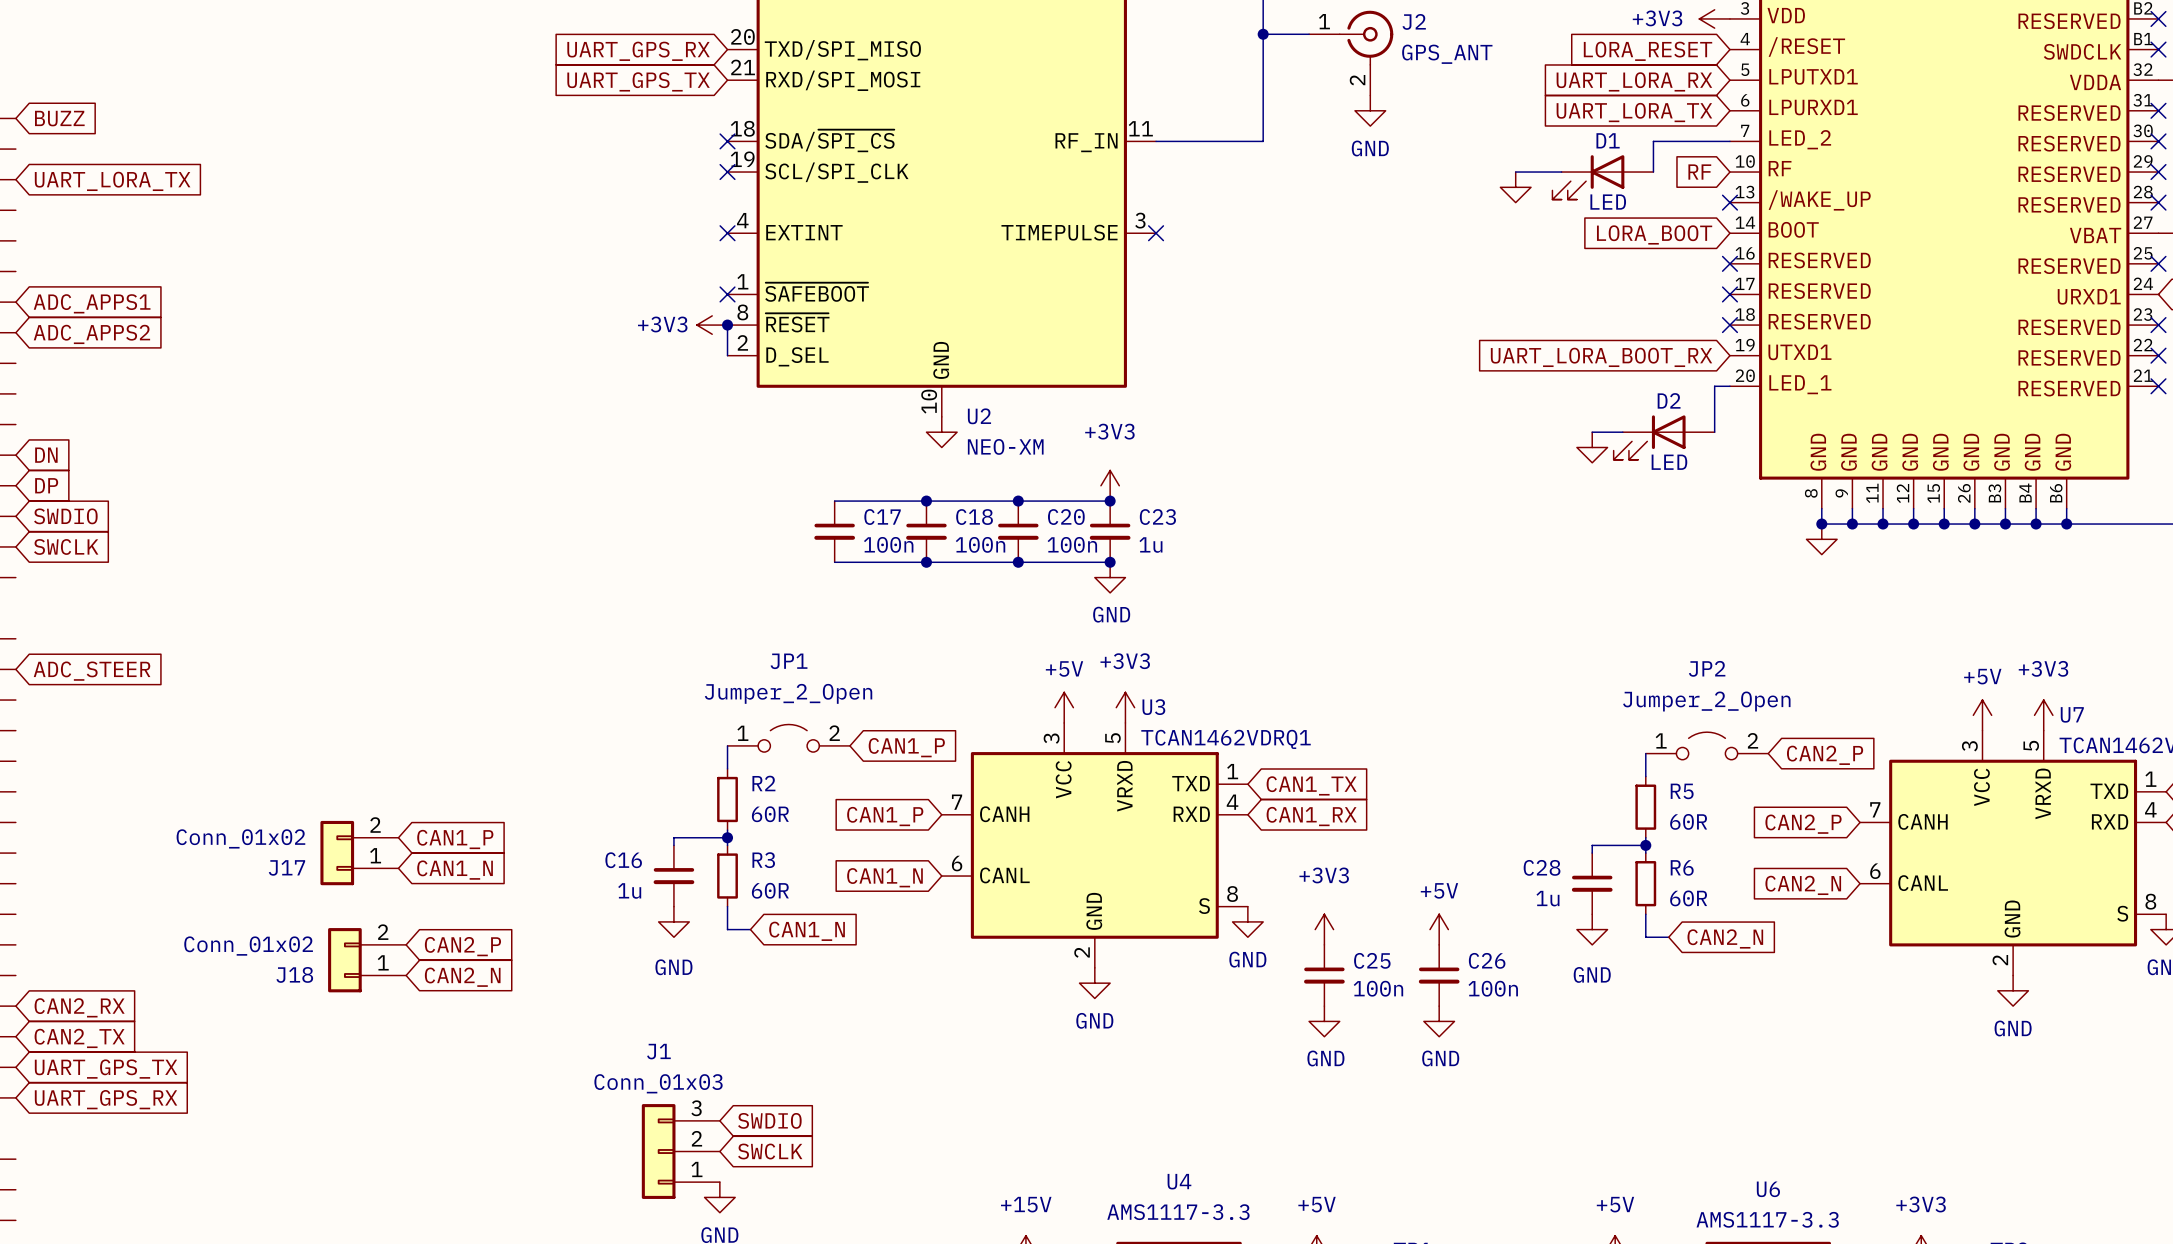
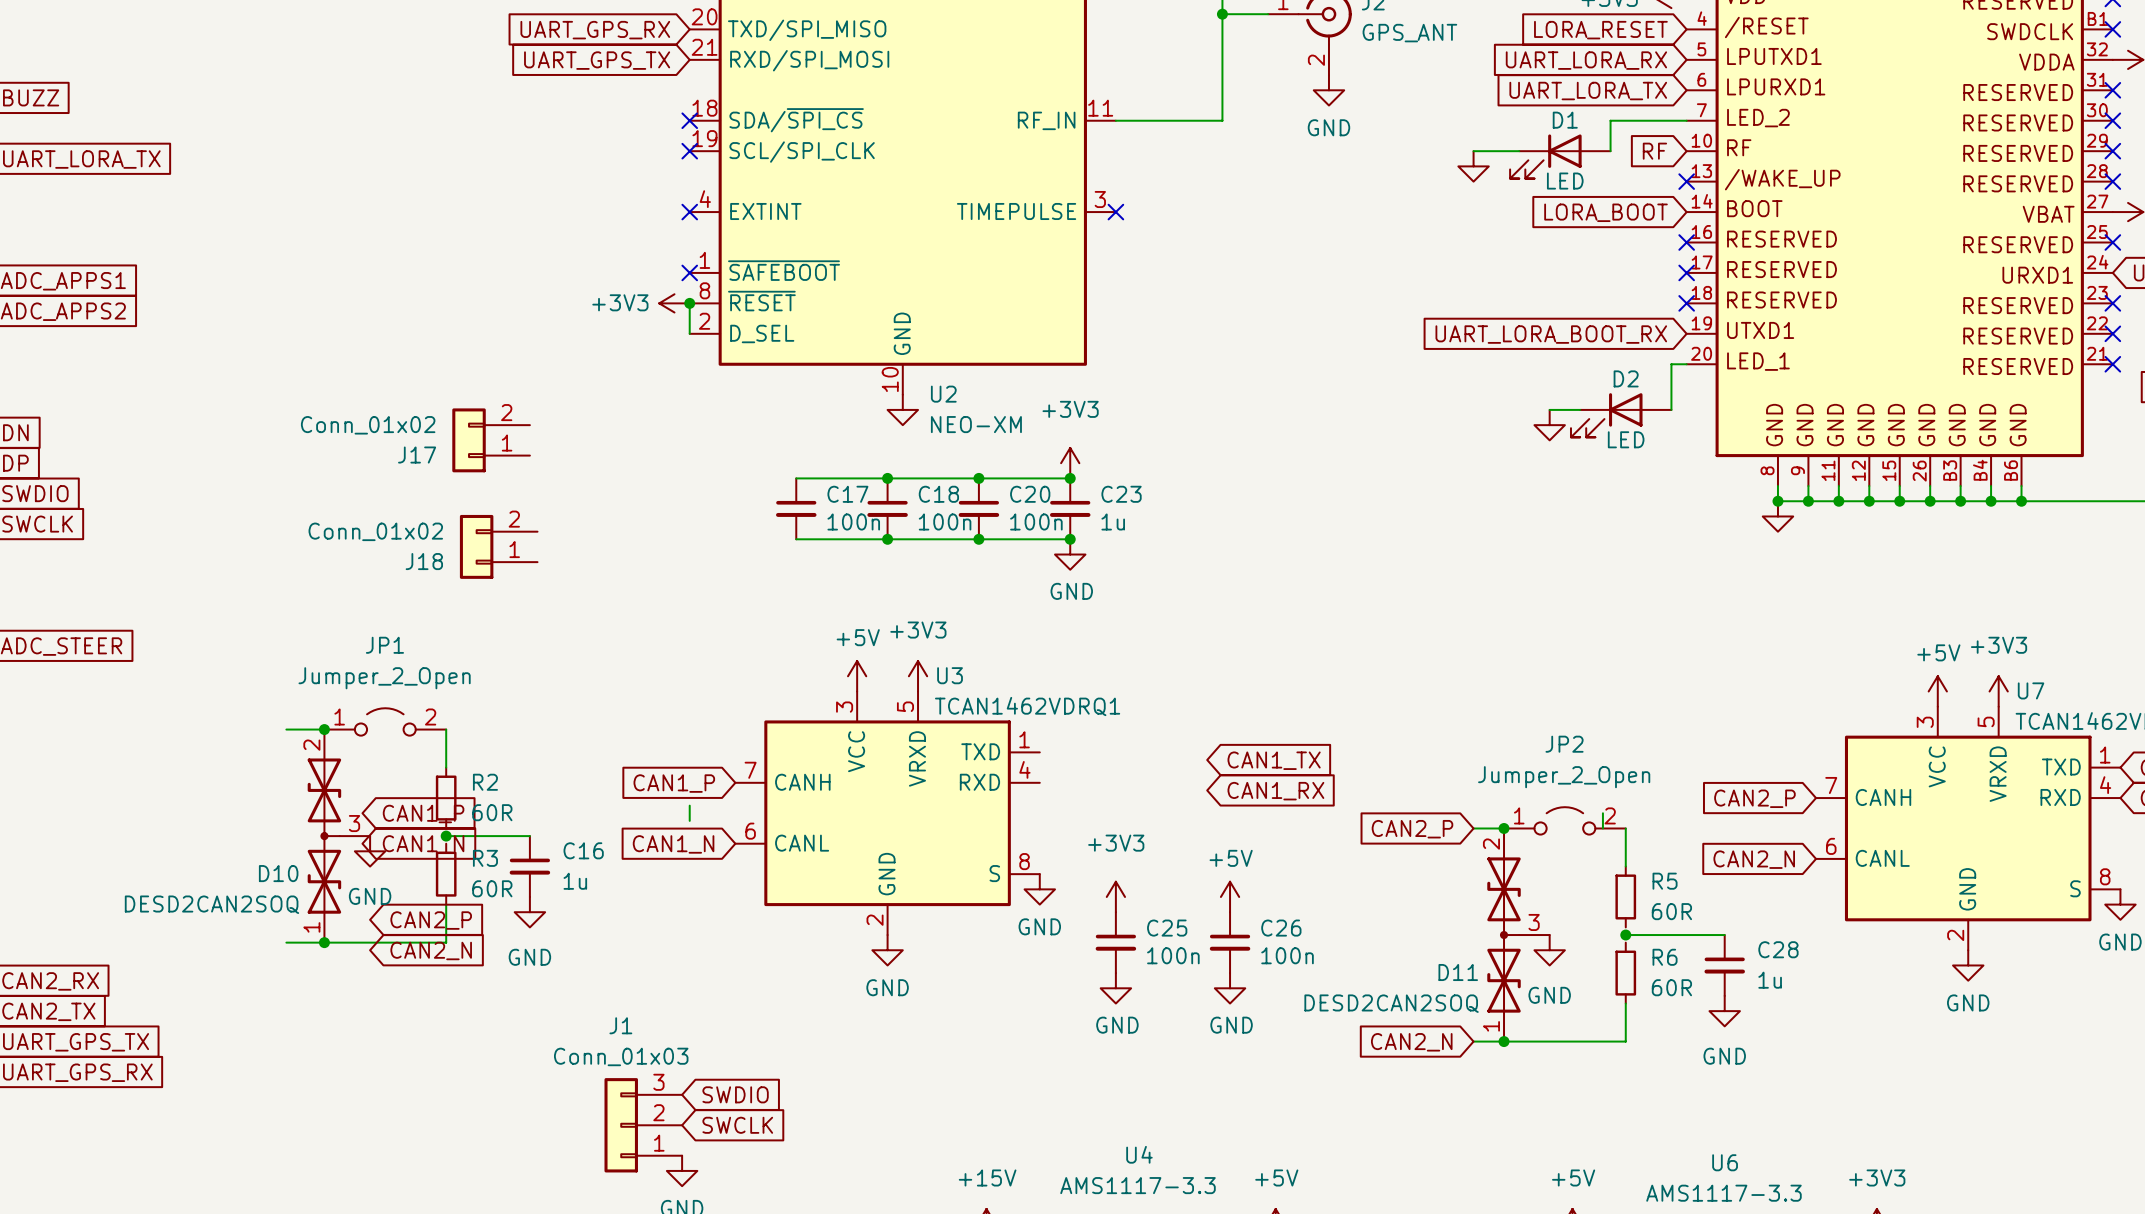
power symbol: none -> +5V (857, 676)
power symbol: none -> +3V3 (918, 676)
power symbol: +5V (1064, 707) -> none
power symbol: +3V3 (1125, 707) -> none
JP1 position: (788, 738) -> (385, 721)
wire: (727, 745) (727, 768) -> none
JP2 position: (1707, 745) -> (1564, 820)
global label: CAN1_P (906, 747) -> none
wire: none -> (286, 729) (324, 729)
junction: none -> (324, 729)
wire: none -> (446, 729) (446, 767)
wire: (1645, 753) (1645, 776) -> none
global label rotation: 0° (1825, 755) -> 180° (1412, 829)
global label position: CAN2_P (1825, 755) -> CAN2_P (1412, 829)
R2 position: (727, 799) -> (446, 798)
R5 position: (1645, 807) -> (1625, 896)
global label: none -> CAN1_P (674, 783)
global label: CAN1_P (885, 816) -> none
wire: (727, 837) (673, 837) (673, 845) -> none
junction: (727, 837) -> none
U3 position: (1094, 845) -> (887, 813)
wire: (1645, 845) (1592, 845) (1592, 853) -> none
junction: (1645, 845) -> none
J17 position: (359, 853) -> (491, 440)
wire: none -> (1473, 828) (1504, 828)
junction: none -> (1504, 828)
wire: none -> (1625, 828) (1625, 866)
D10: none -> DESD2CAN2SOQ (338, 836)
wire: none -> (446, 836) (529, 836)
junction: none -> (446, 836)
C16 name position: C16 (623, 860) -> C16 (583, 850)
C28 name position: C28 (1542, 867) -> C28 (1778, 949)
power symbol: none -> GND (370, 851)
C16 position: (673, 876) -> (529, 866)
R3 position: (727, 876) -> (446, 874)
global label: CAN1_N (884, 877) -> none
C28 position: (1592, 883) -> (1724, 965)
R6 position: (1645, 883) -> (1625, 973)
C16 value position: 1u (629, 890) -> 1u (575, 881)
C28 value position: 1u (1547, 898) -> 1u (1770, 980)
wire: (727, 906) (727, 929) (750, 929) -> none
power symbol: none -> GND (1039, 889)
wire: (1645, 914) (1645, 937) (1668, 937) -> none
power symbol position: GND (673, 921) -> GND (529, 912)
power symbol: none -> +3V3 (1115, 896)
power symbol: GND (1247, 921) -> none
power symbol: none -> +5V (1230, 896)
wire: none -> (446, 904) (446, 942) (286, 942)
power symbol: +3V3 (1324, 929) -> none
power symbol: +5V (1439, 929) -> none
power symbol position: GND (1592, 929) -> GND (1549, 950)
global label rotation: 0° (807, 931) -> 180° (673, 844)
global label rotation: 0° (1725, 938) -> 180° (1411, 1042)
global label position: CAN2_N (1725, 938) -> CAN2_N (1411, 1042)
J18 position: (367, 960) -> (498, 546)
D11: none -> DESD2CAN2SOQ (1518, 935)
wire: none -> (1625, 935) (1724, 935)
junction: none -> (1625, 935)
junction: none -> (324, 942)
power symbol: none -> GND (887, 950)
C25 position: (1324, 975) -> (1115, 942)
C26 position: (1439, 975) -> (1230, 942)
power symbol: GND (1094, 983) -> none
power symbol: none -> GND (1115, 988)
power symbol: none -> GND (1230, 988)
power symbol: GND (1324, 1021) -> none
power symbol: GND (1439, 1021) -> none
wire: none -> (1625, 1003) (1625, 1041) (1473, 1041)
power symbol: none -> GND (1724, 1011)
junction: none -> (1504, 1041)

